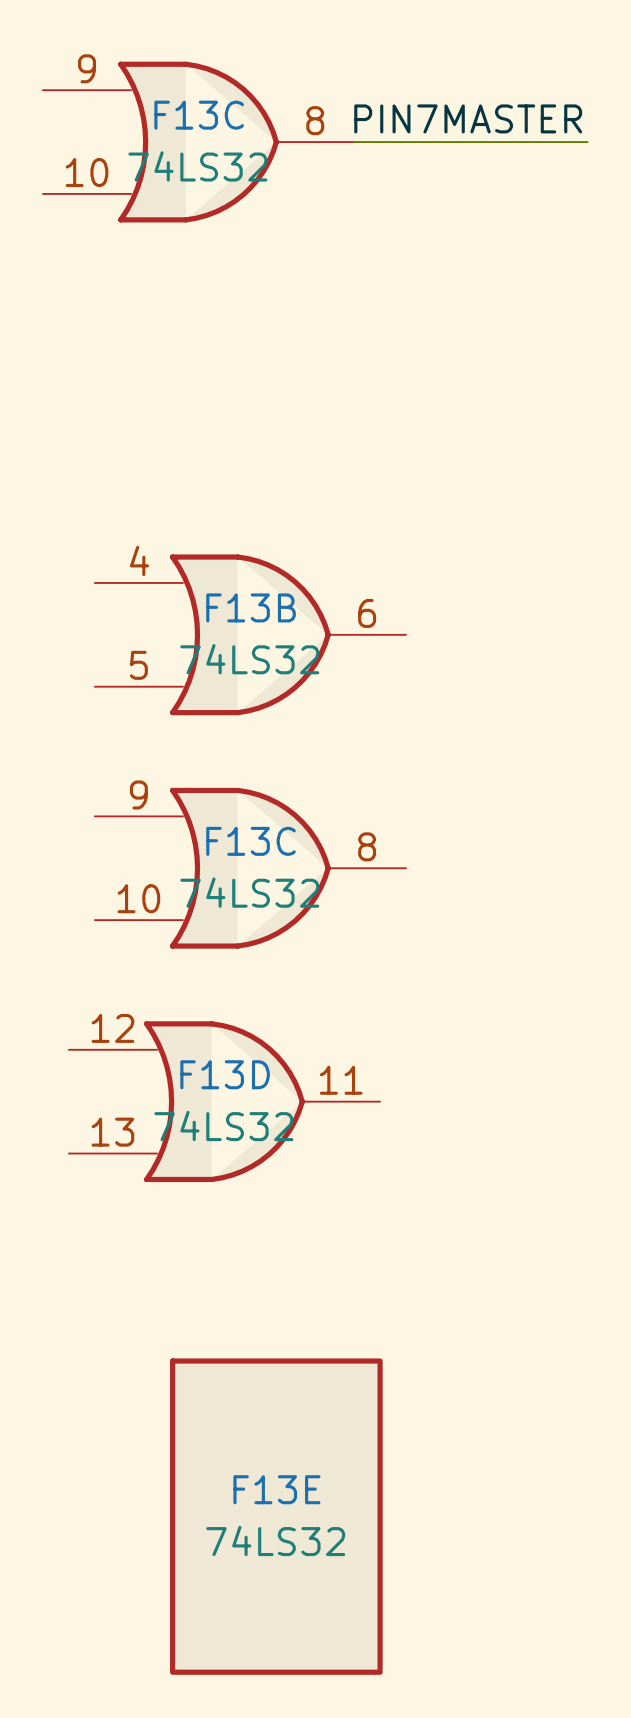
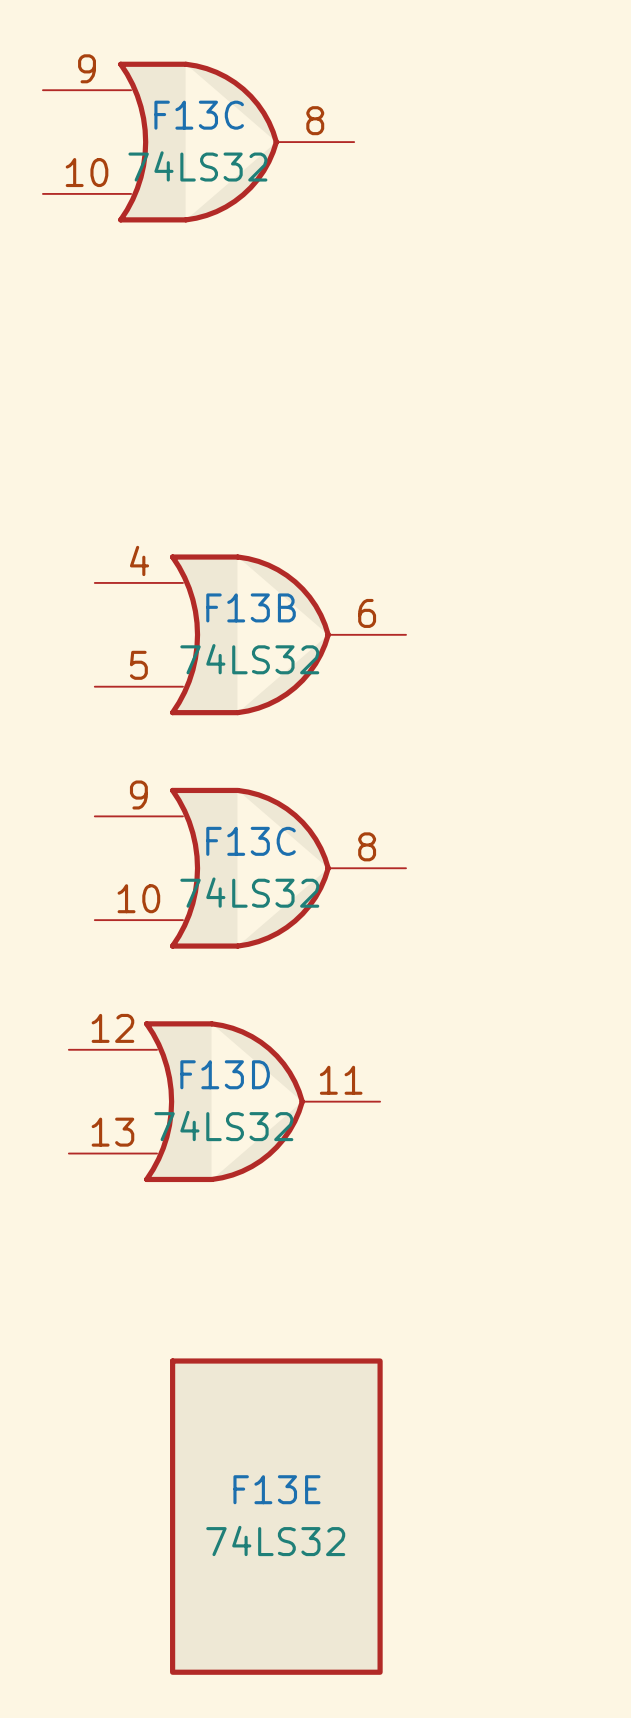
label: PIN7MASTER (468, 118) -> none
wire: (354, 142) (587, 142) -> none

